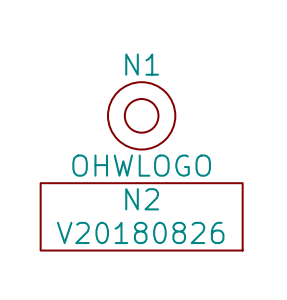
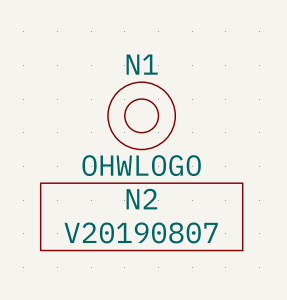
N2 value: V20180826 (140, 232) -> V20190807 (141, 232)

